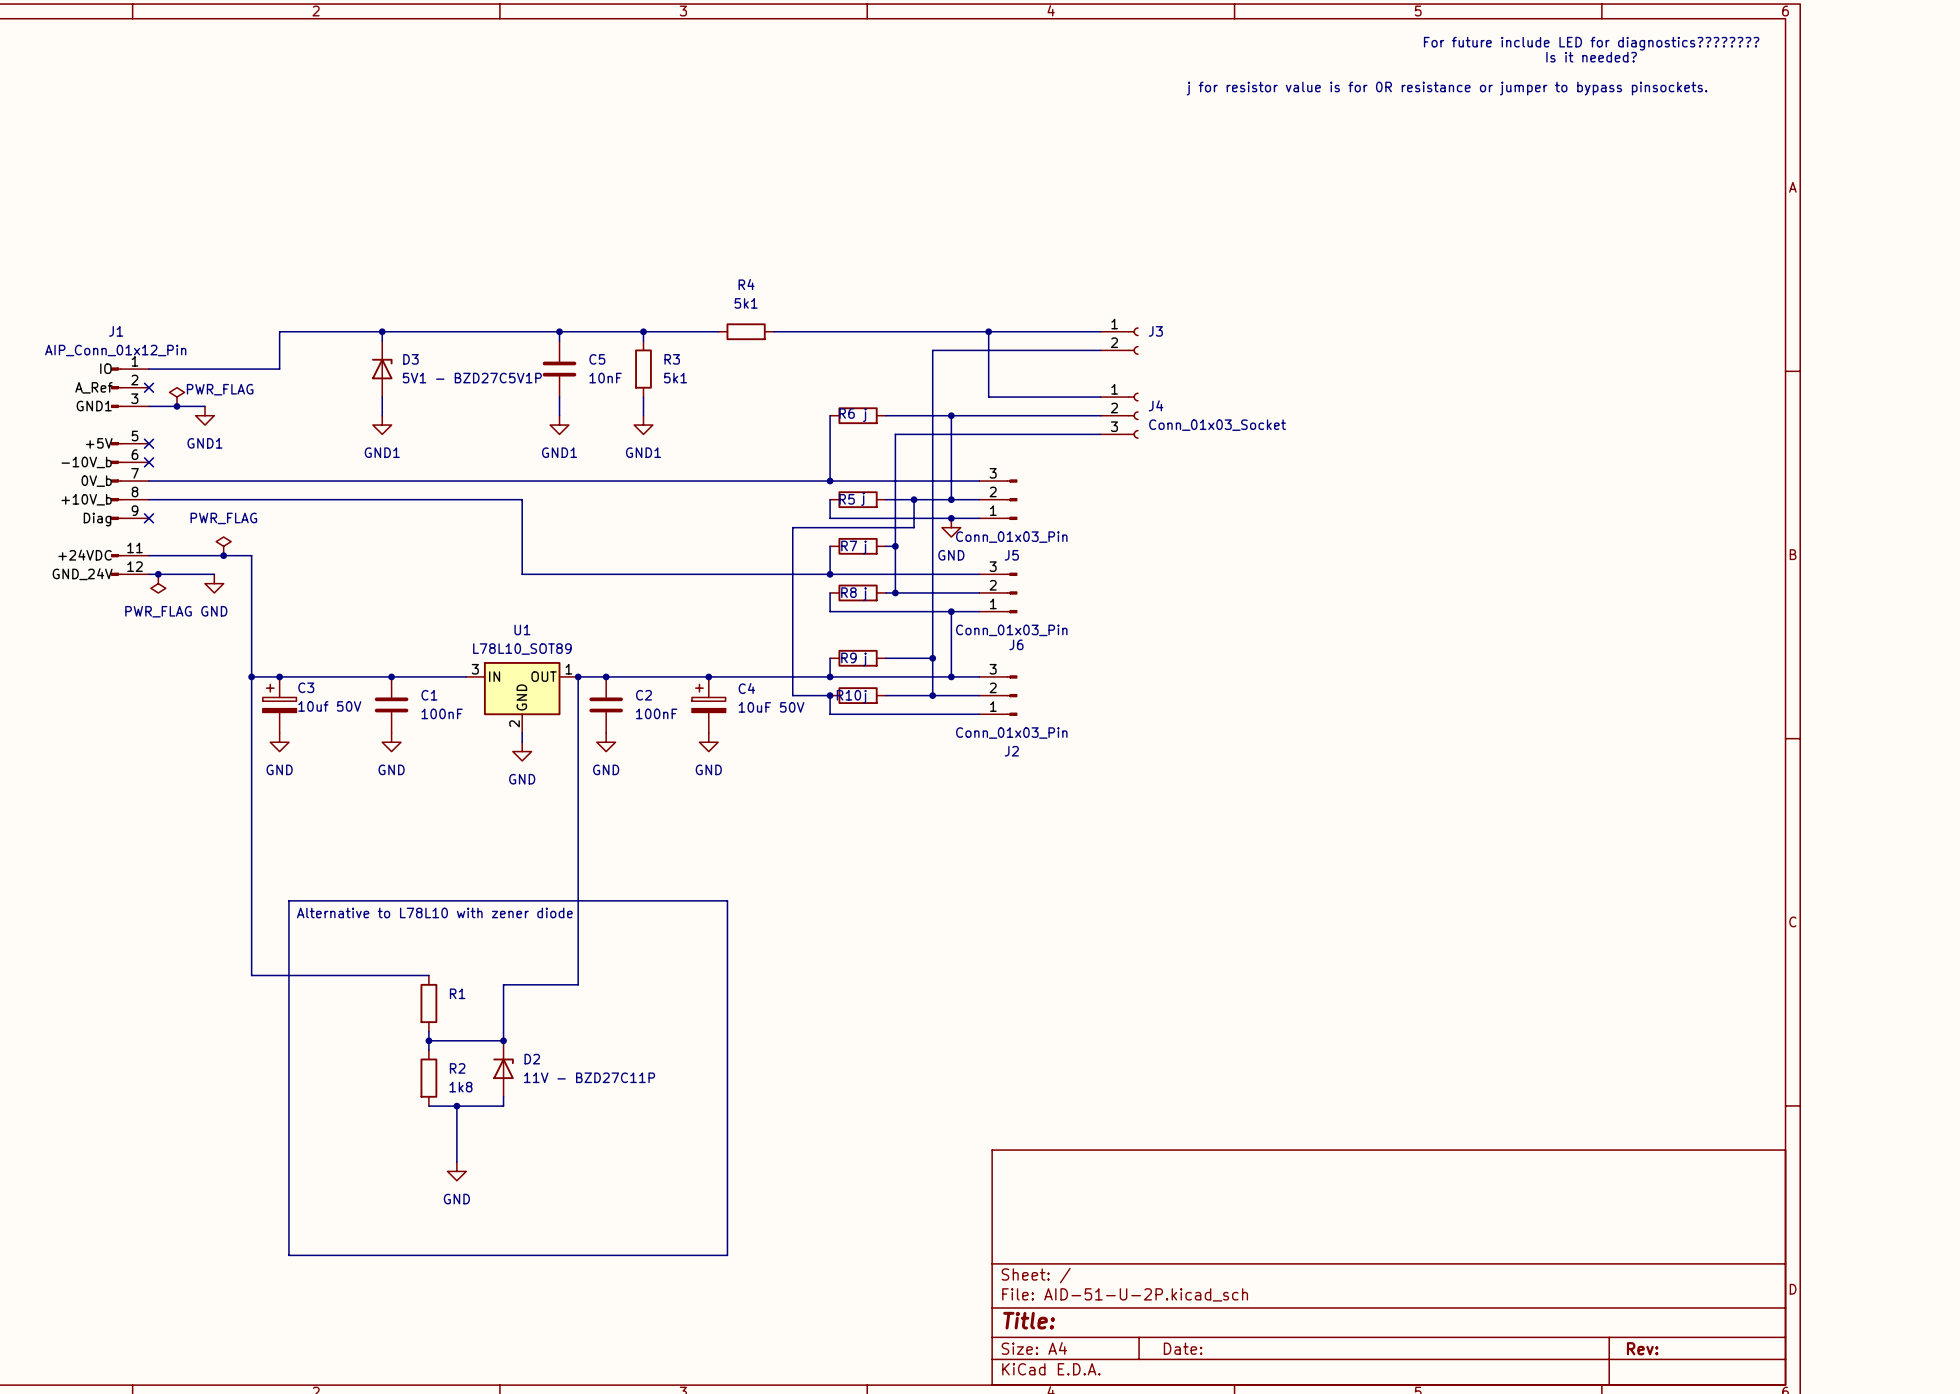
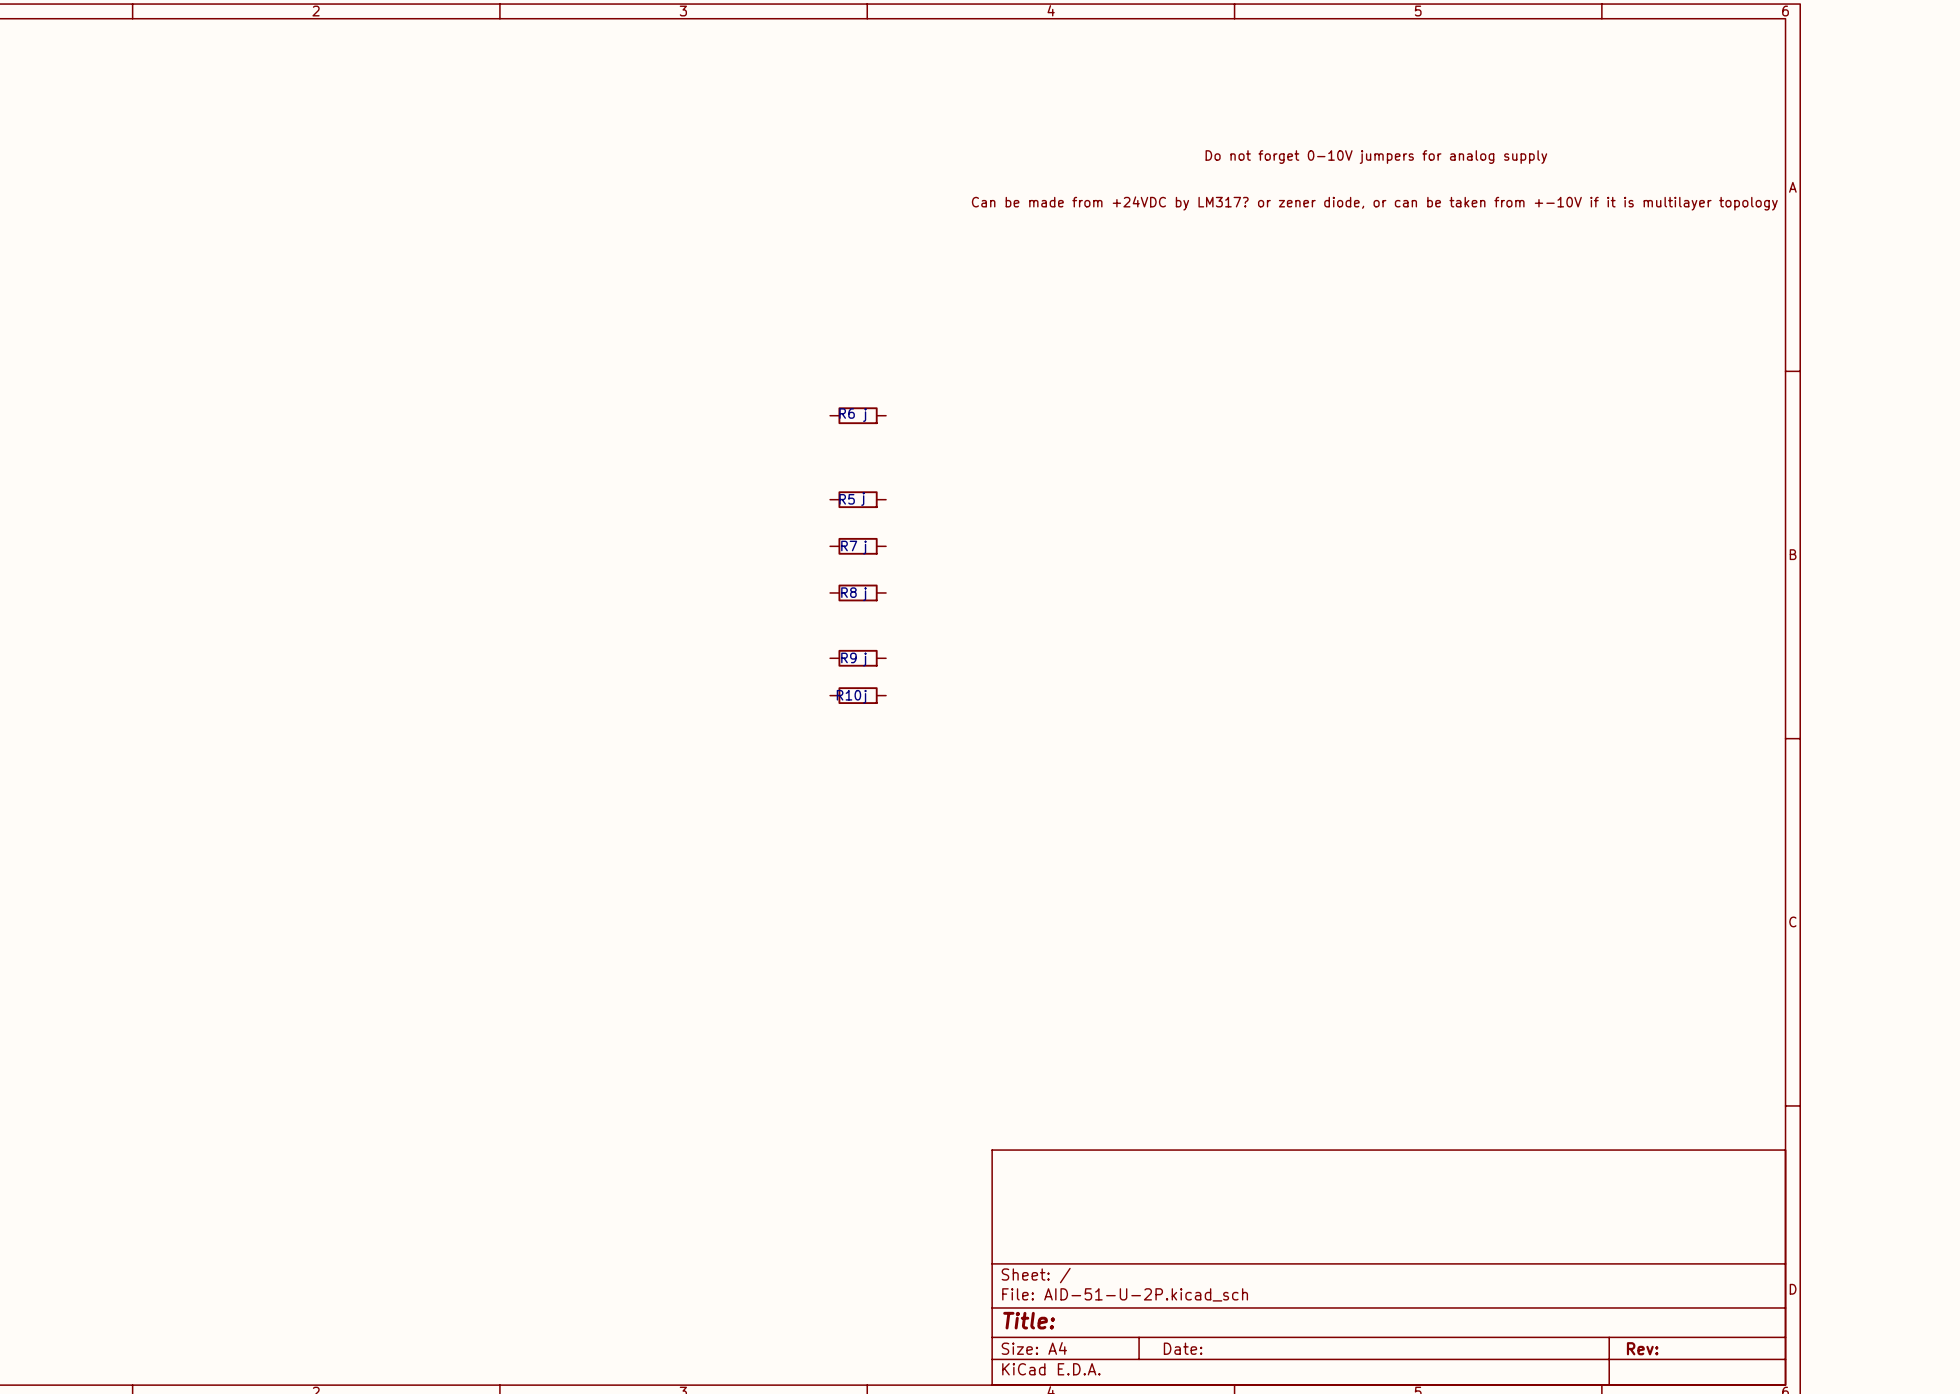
text: For future include LED for diagnostics???????? (1591, 43) -> none
text: Is it needed? (1591, 57) -> none
text: j for resistor value is for 0R resistance or jumper to bypass pinsockets. (1447, 88) -> none
label: none -> Do not forget 0-10V jumpers for analog supply (1376, 157)
label: none -> Can be made from +24VDC by LM317? or zener diode, or can be taken from +-10V if it is multilayer topology (1374, 203)
wire: (382, 331) (382, 341) -> none
junction: (382, 331) -> none
wire: (559, 331) (559, 341) -> none
junction: (559, 331) -> none
wire: (643, 331) (643, 341) -> none
junction: (643, 331) -> none
wire: (718, 331) (279, 331) (279, 369) (149, 369) -> none
R4: 5k1 (746, 331) -> none
wire: (774, 331) (1100, 331) -> none
wire: (988, 331) (988, 397) (1100, 397) -> none
junction: (988, 331) -> none
J3: (1119, 341) -> none
wire: (1100, 350) (932, 350) (932, 695) -> none
D3: 5V1 - BZD27C5V1P (382, 369) -> none
C5: 10nF (559, 369) -> none
R3: 5k1 (643, 369) -> none
no-connect mark: (149, 387) -> none
power symbol: PWR_FLAG (177, 397) -> none
wire: (382, 397) (382, 415) -> none
wire: (559, 397) (559, 415) -> none
wire: (643, 397) (643, 415) -> none
wire: (149, 406) (204, 406) -> none
junction: (177, 406) -> none
power symbol: GND1 (204, 415) -> none
wire: (830, 415) (830, 481) -> none
wire: (886, 415) (1100, 415) -> none
wire: (951, 415) (951, 499) -> none
junction: (951, 415) -> none
J4: Conn_01x03_Socket (1119, 415) -> none
power symbol: GND1 (382, 425) -> none
power symbol: GND1 (559, 425) -> none
power symbol: GND1 (643, 425) -> none
wire: (1100, 434) (895, 434) (895, 592) -> none
no-connect mark: (149, 443) -> none
no-connect mark: (149, 462) -> none
J1: AIP_Conn_01x12_Pin (130, 471) -> none
wire: (149, 481) (979, 481) -> none
junction: (830, 481) -> none
wire: (149, 499) (522, 499) (522, 574) (979, 574) -> none
wire: (830, 499) (830, 518) (979, 518) -> none
wire: (886, 499) (979, 499) -> none
wire: (914, 499) (914, 527) (792, 527) (792, 695) (830, 695) (830, 714) (979, 714) -> none
junction: (914, 499) -> none
junction: (951, 499) -> none
J5: Conn_01x03_Pin (998, 499) -> none
no-connect mark: (149, 518) -> none
junction: (951, 518) -> none
power symbol: GND (951, 527) -> none
power symbol: PWR_FLAG (223, 546) -> none
wire: (830, 546) (830, 574) -> none
wire: (886, 546) (895, 546) -> none
junction: (895, 546) -> none
wire: (149, 555) (251, 555) (251, 975) (428, 975) -> none
junction: (223, 555) -> none
wire: (149, 574) (214, 574) -> none
junction: (158, 574) -> none
junction: (830, 574) -> none
power symbol: PWR_FLAG (158, 583) -> none
power symbol: GND (214, 583) -> none
wire: (830, 592) (830, 611) (979, 611) -> none
wire: (886, 592) (979, 592) -> none
junction: (895, 592) -> none
J6: Conn_01x03_Pin (998, 592) -> none
wire: (951, 611) (951, 676) -> none
junction: (951, 611) -> none
wire: (830, 658) (830, 676) -> none
wire: (886, 658) (932, 658) -> none
junction: (932, 658) -> none
wire: (251, 676) (466, 676) -> none
junction: (251, 676) -> none
junction: (279, 676) -> none
junction: (391, 676) -> none
junction: (578, 676) -> none
junction: (606, 676) -> none
junction: (708, 676) -> none
junction: (830, 676) -> none
junction: (951, 676) -> none
wire: (979, 676) (578, 676) (578, 984) (503, 984) (503, 1040) (428, 1040) -> none
junction: (830, 695) -> none
wire: (886, 695) (979, 695) -> none
junction: (932, 695) -> none
J2: Conn_01x03_Pin (998, 695) -> none
U1: L78L10_SOT89 (522, 697) -> none
C3: 10uf 50V (279, 704) -> none
C1: 100nF (391, 704) -> none
C2: 100nF (606, 704) -> none
C4: 10uF 50V (708, 704) -> none
wire: (522, 732) (522, 742) -> none
power symbol: GND (279, 742) -> none
power symbol: GND (391, 742) -> none
power symbol: GND (606, 742) -> none
power symbol: GND (708, 742) -> none
power symbol: GND (522, 751) -> none
line: (288, 900) (727, 900) (727, 1255) (288, 1255) (288, 900) -> none
text: Alternative to L78L10 with zener diode (434, 912) -> none
R1: (428, 1003) -> none
wire: (428, 1031) (428, 1050) -> none
junction: (428, 1040) -> none
junction: (503, 1040) -> none
D2: 11V - BZD27C11P (503, 1068) -> none
R2: 1k8 (428, 1078) -> none
wire: (503, 1096) (503, 1106) (428, 1106) -> none
wire: (456, 1106) (456, 1162) -> none
junction: (456, 1106) -> none
power symbol: GND (456, 1171) -> none

